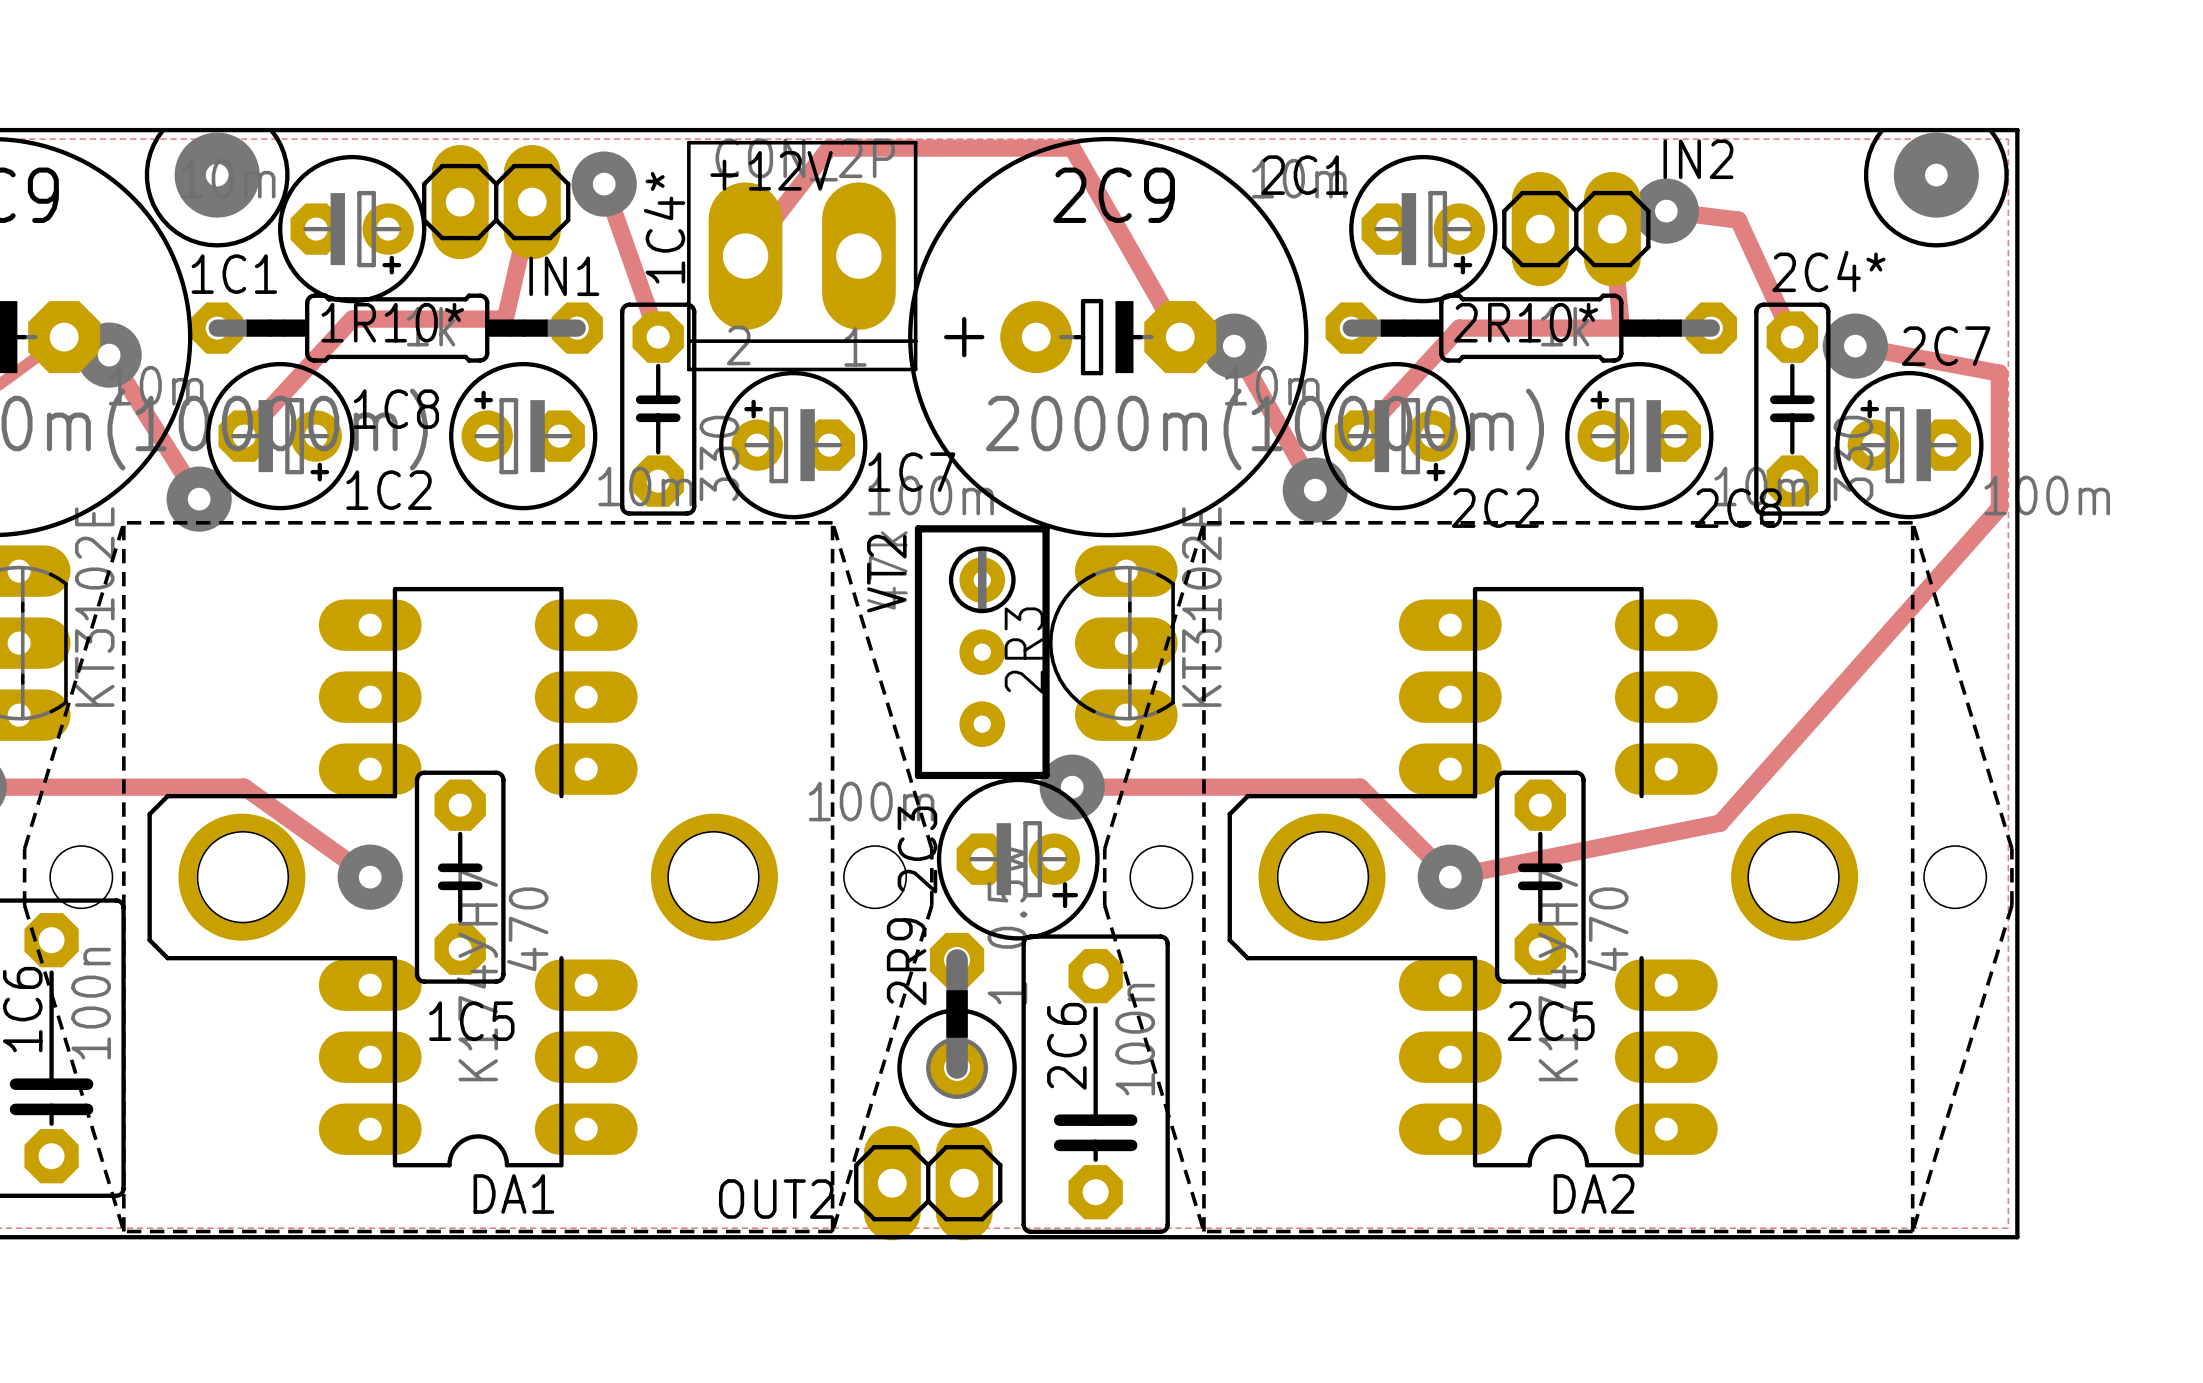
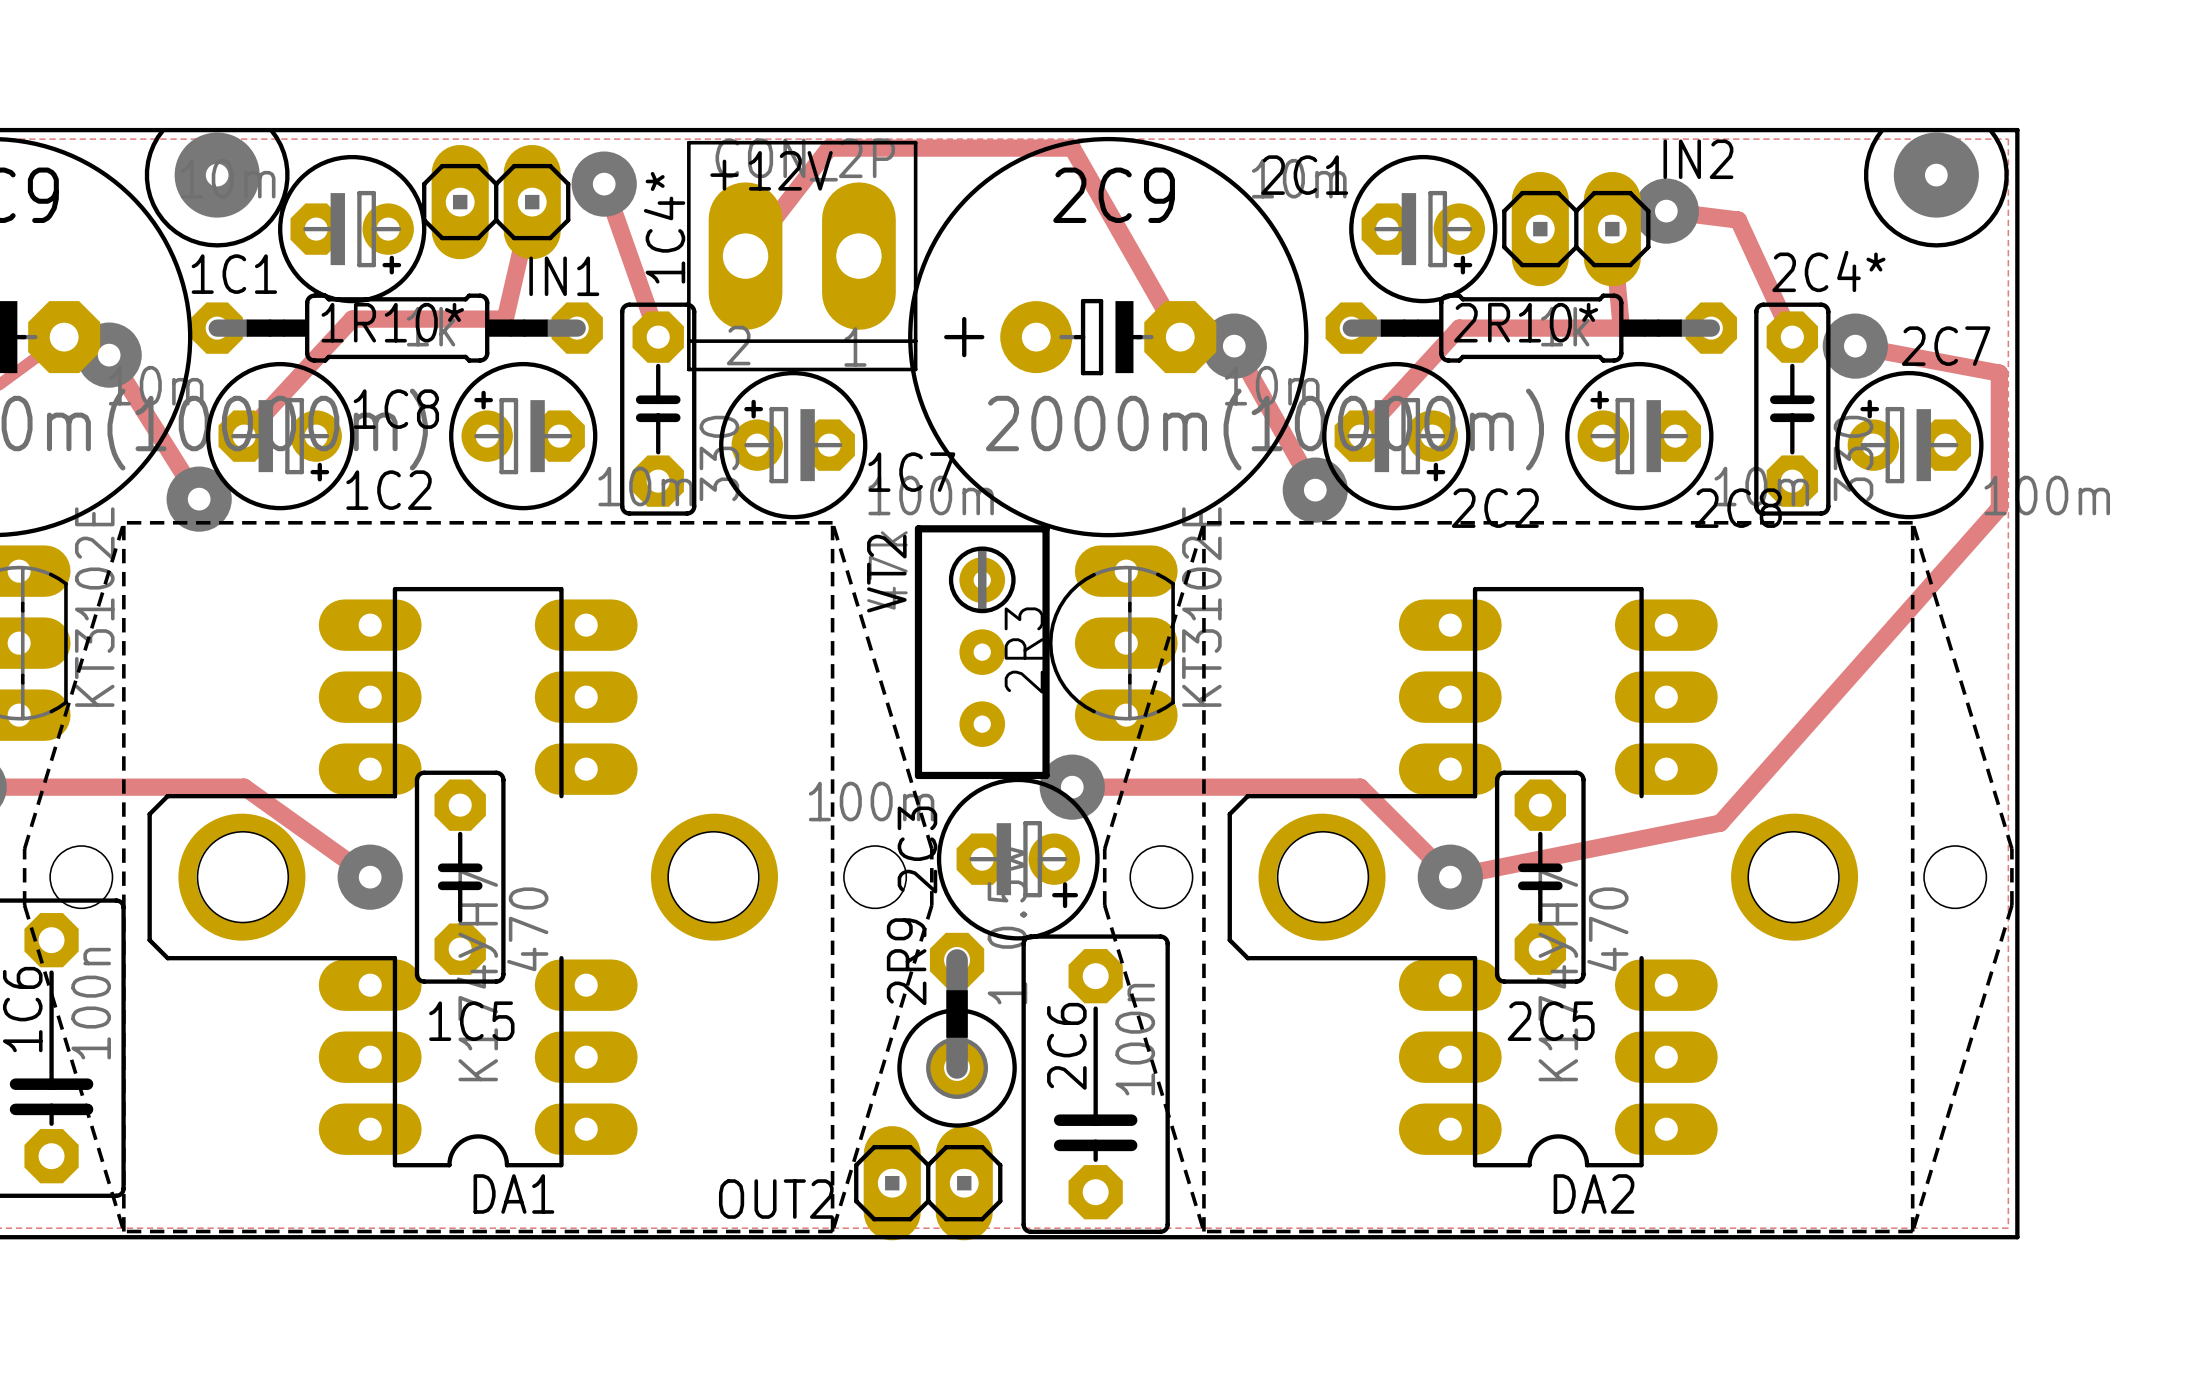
IN1 footprint: [422, 144, 571, 260] -> [422, 144, 571, 260]
IN2 footprint: [1502, 171, 1651, 287] -> [1502, 171, 1651, 287]
OUT2 footprint: [854, 1126, 1003, 1241] -> [854, 1126, 1003, 1241]

